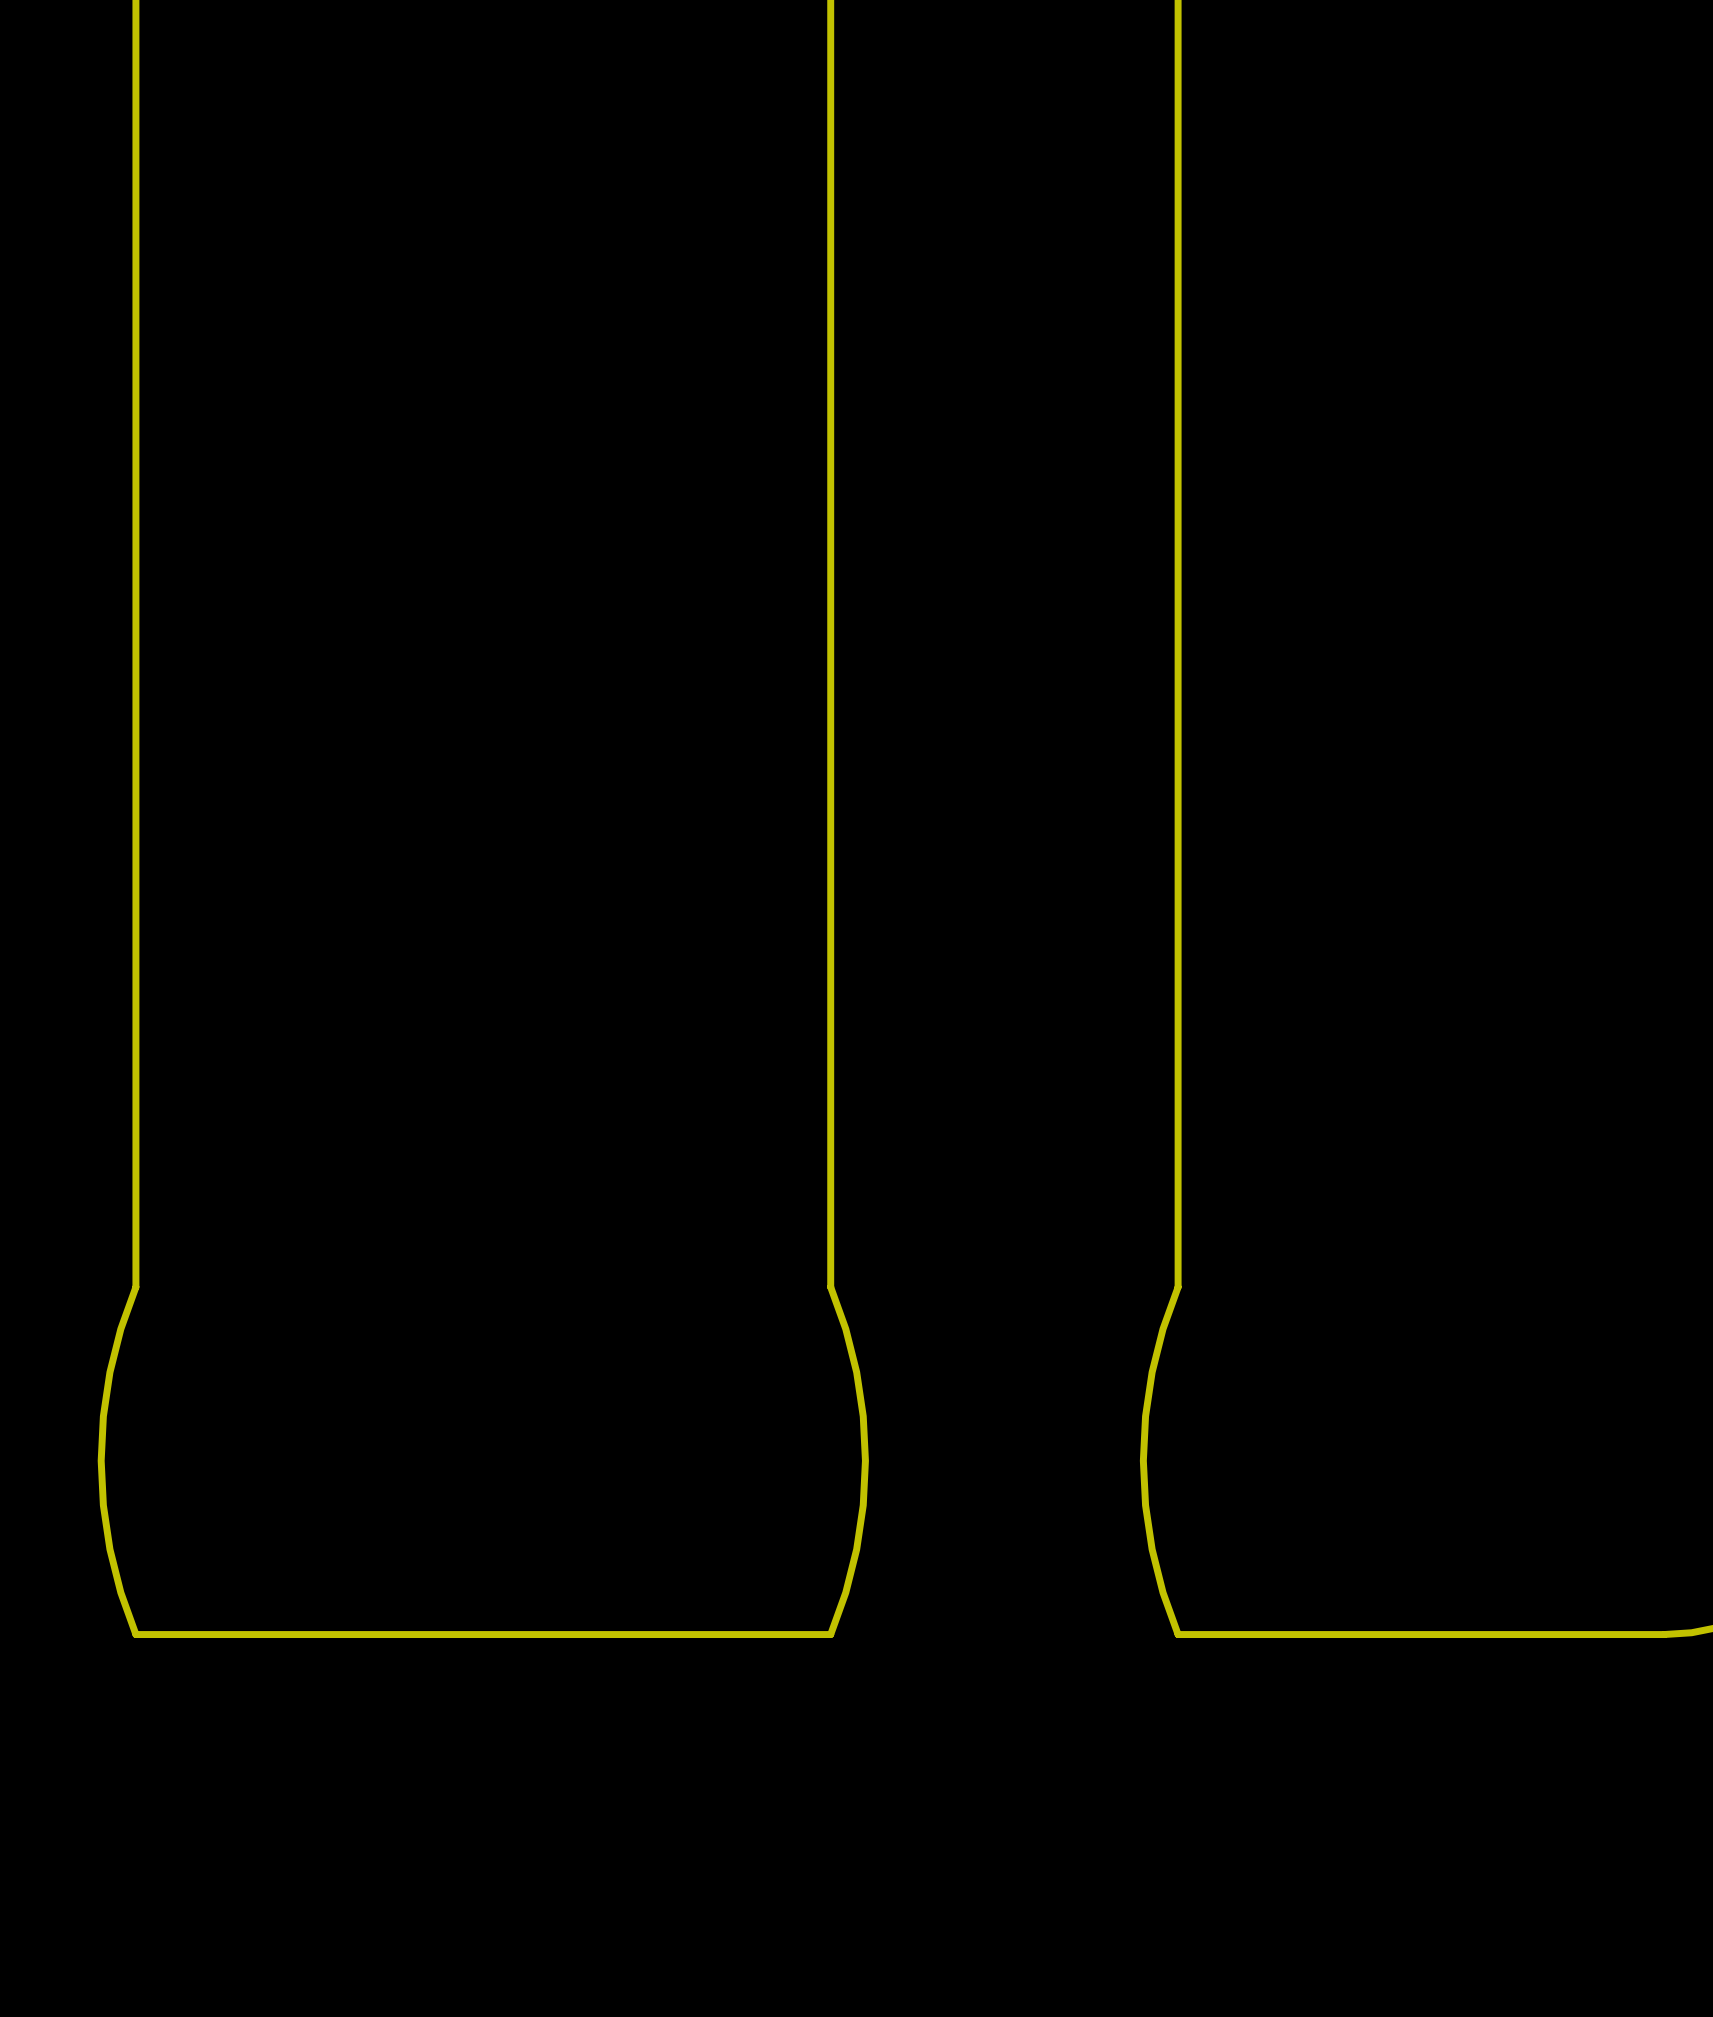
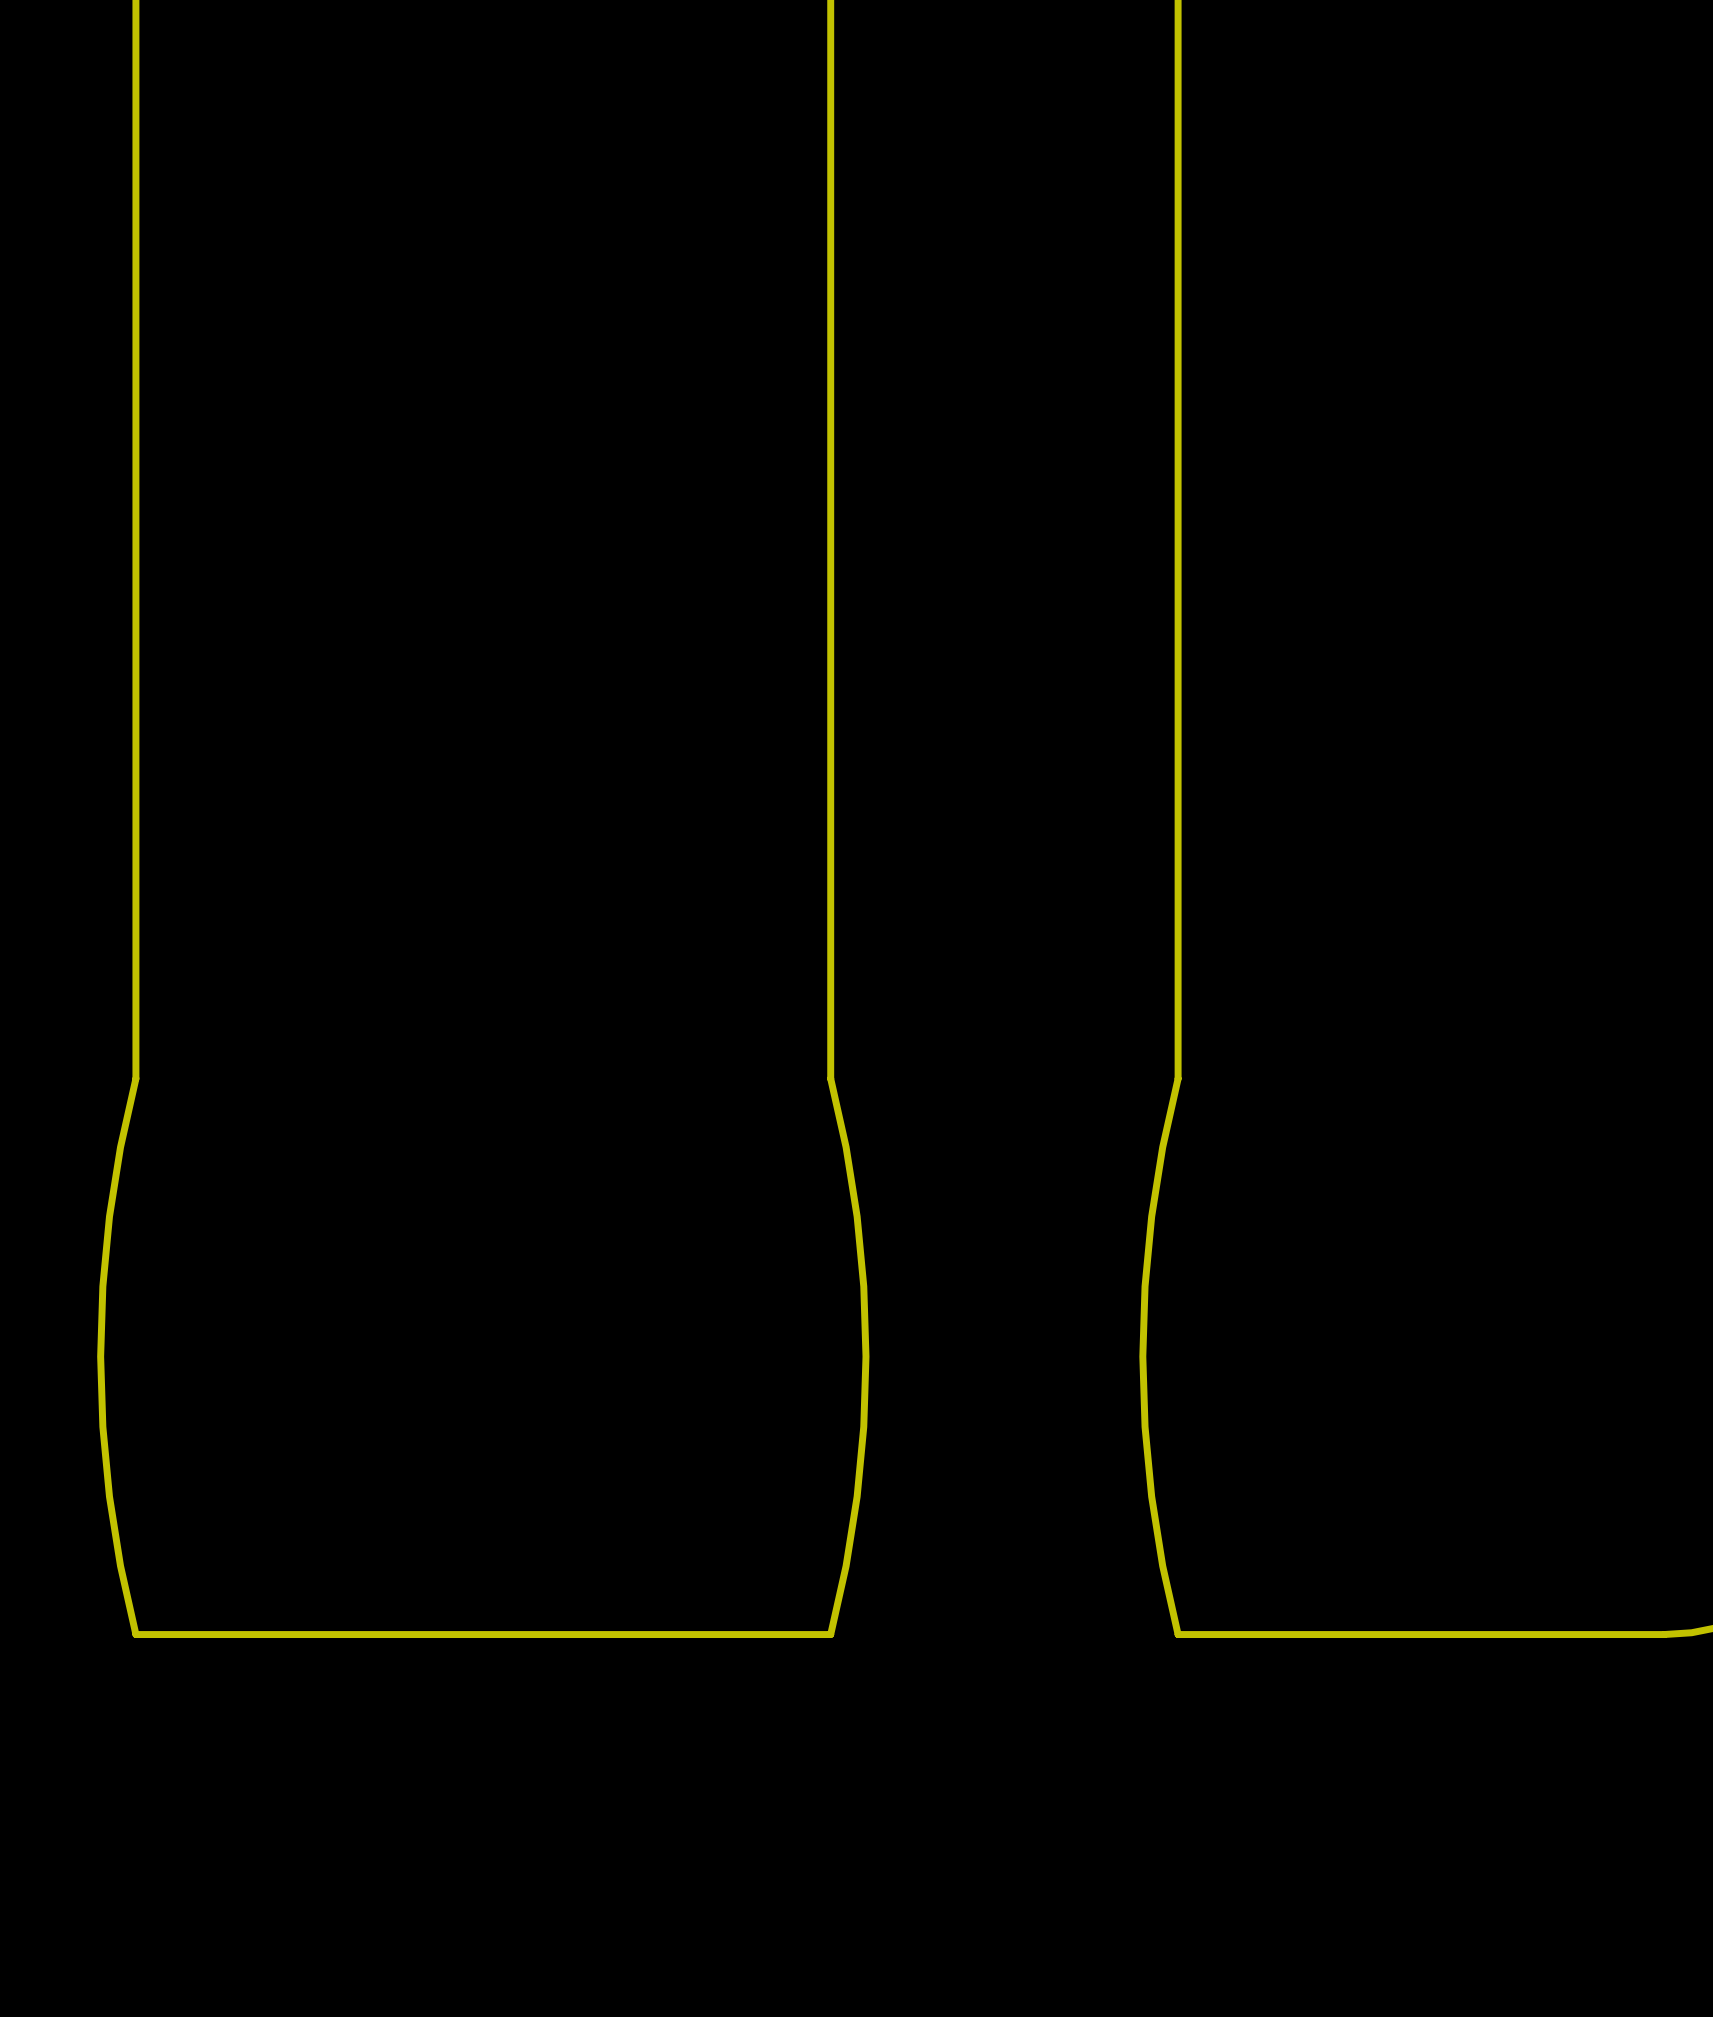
board edge: (135, 1078) (135, 1287) (120, 1329) (109, 1372) (103, 1416) (101, 1460) (103, 1505) (109, 1549) (120, 1592) (135, 1634) -> (135, 1078) (120, 1147) (109, 1216) (102, 1286) (100, 1356) (102, 1426) (109, 1496) (120, 1566) (135, 1634)
board edge: (830, 1078) (830, 1287) (845, 1329) (856, 1372) (863, 1416) (865, 1460) (863, 1505) (856, 1549) (845, 1592) (830, 1634) -> (830, 1078) (846, 1147) (857, 1216) (863, 1286) (865, 1356) (863, 1426) (857, 1496) (846, 1566) (830, 1634)
board edge: (1178, 1078) (1178, 1287) (1163, 1329) (1152, 1372) (1145, 1416) (1143, 1460) (1145, 1505) (1152, 1549) (1163, 1592) (1178, 1634) -> (1178, 1078) (1162, 1147) (1151, 1216) (1145, 1286) (1142, 1356) (1145, 1426) (1151, 1496) (1162, 1566) (1178, 1634)

